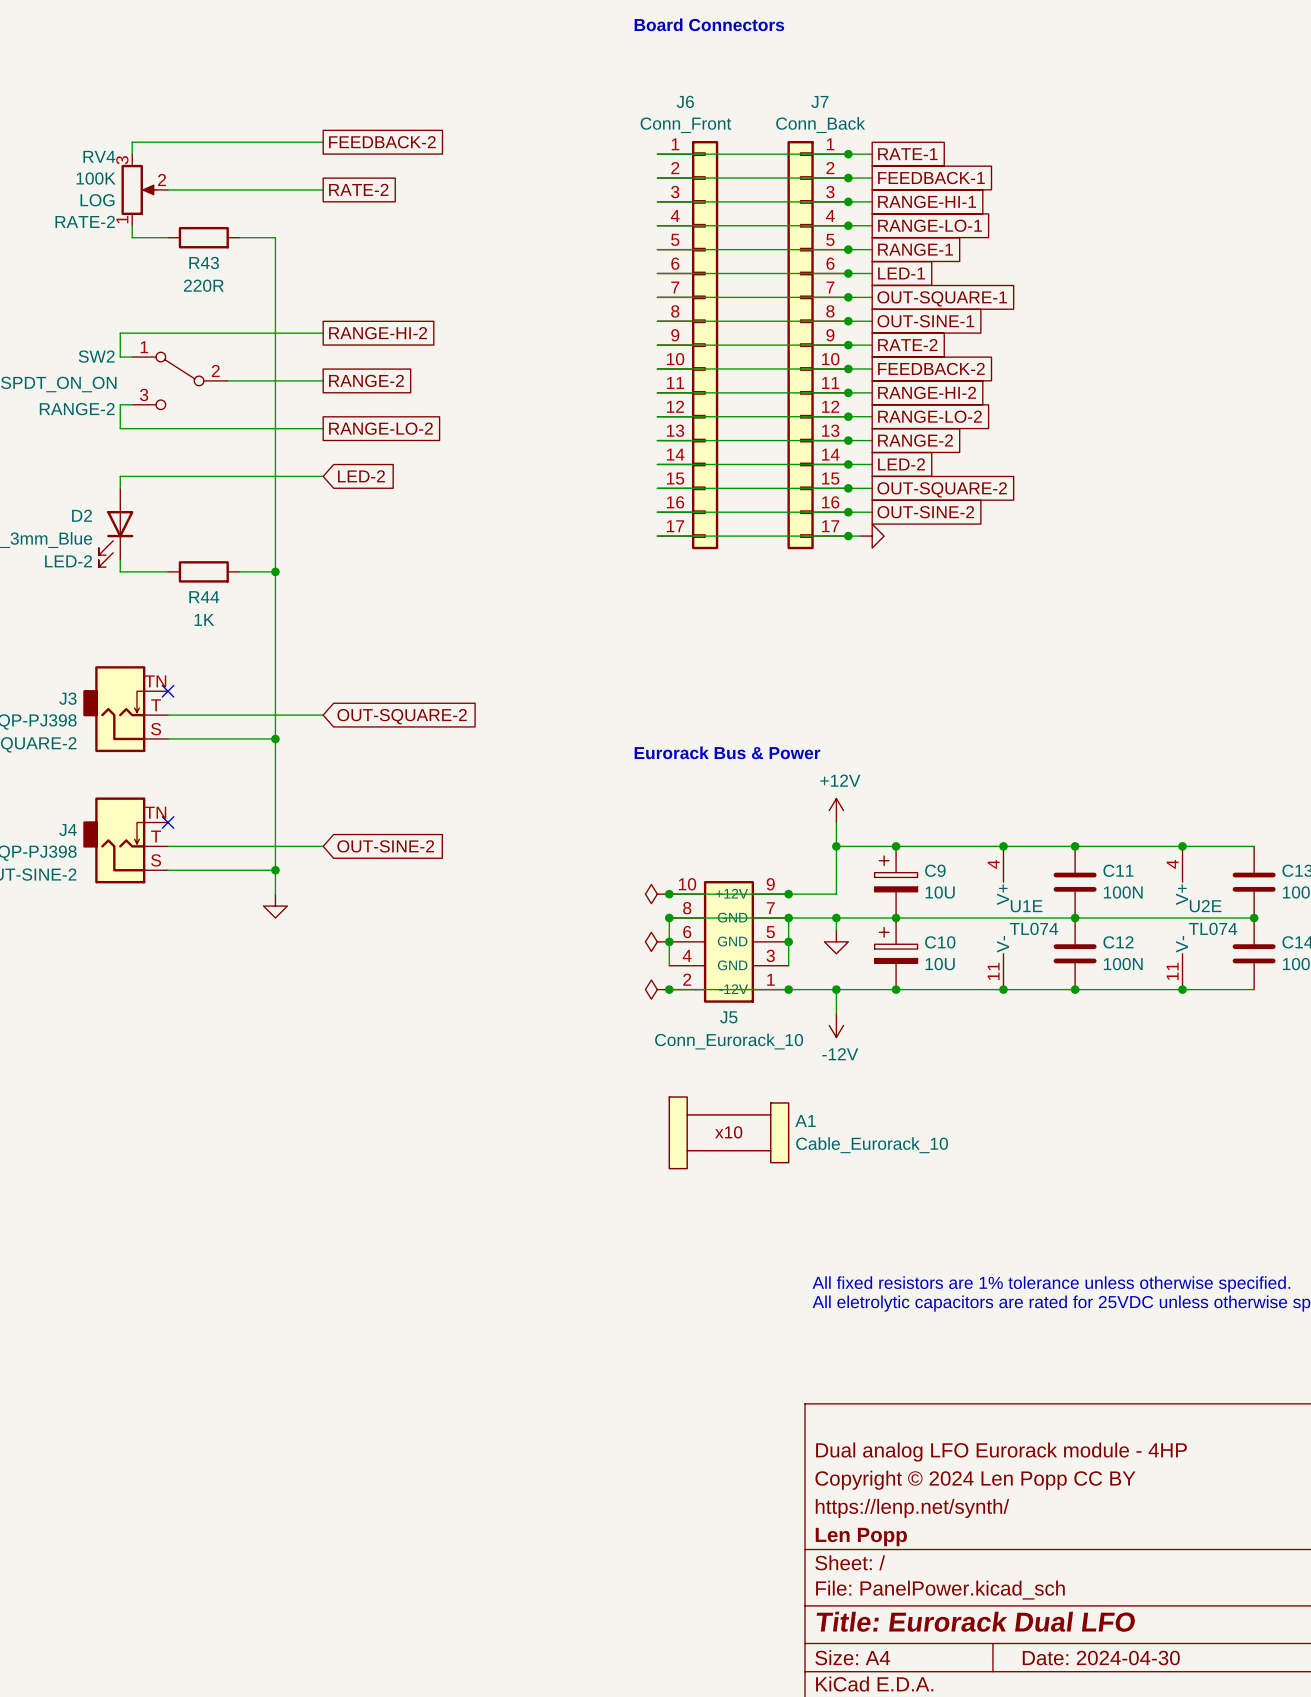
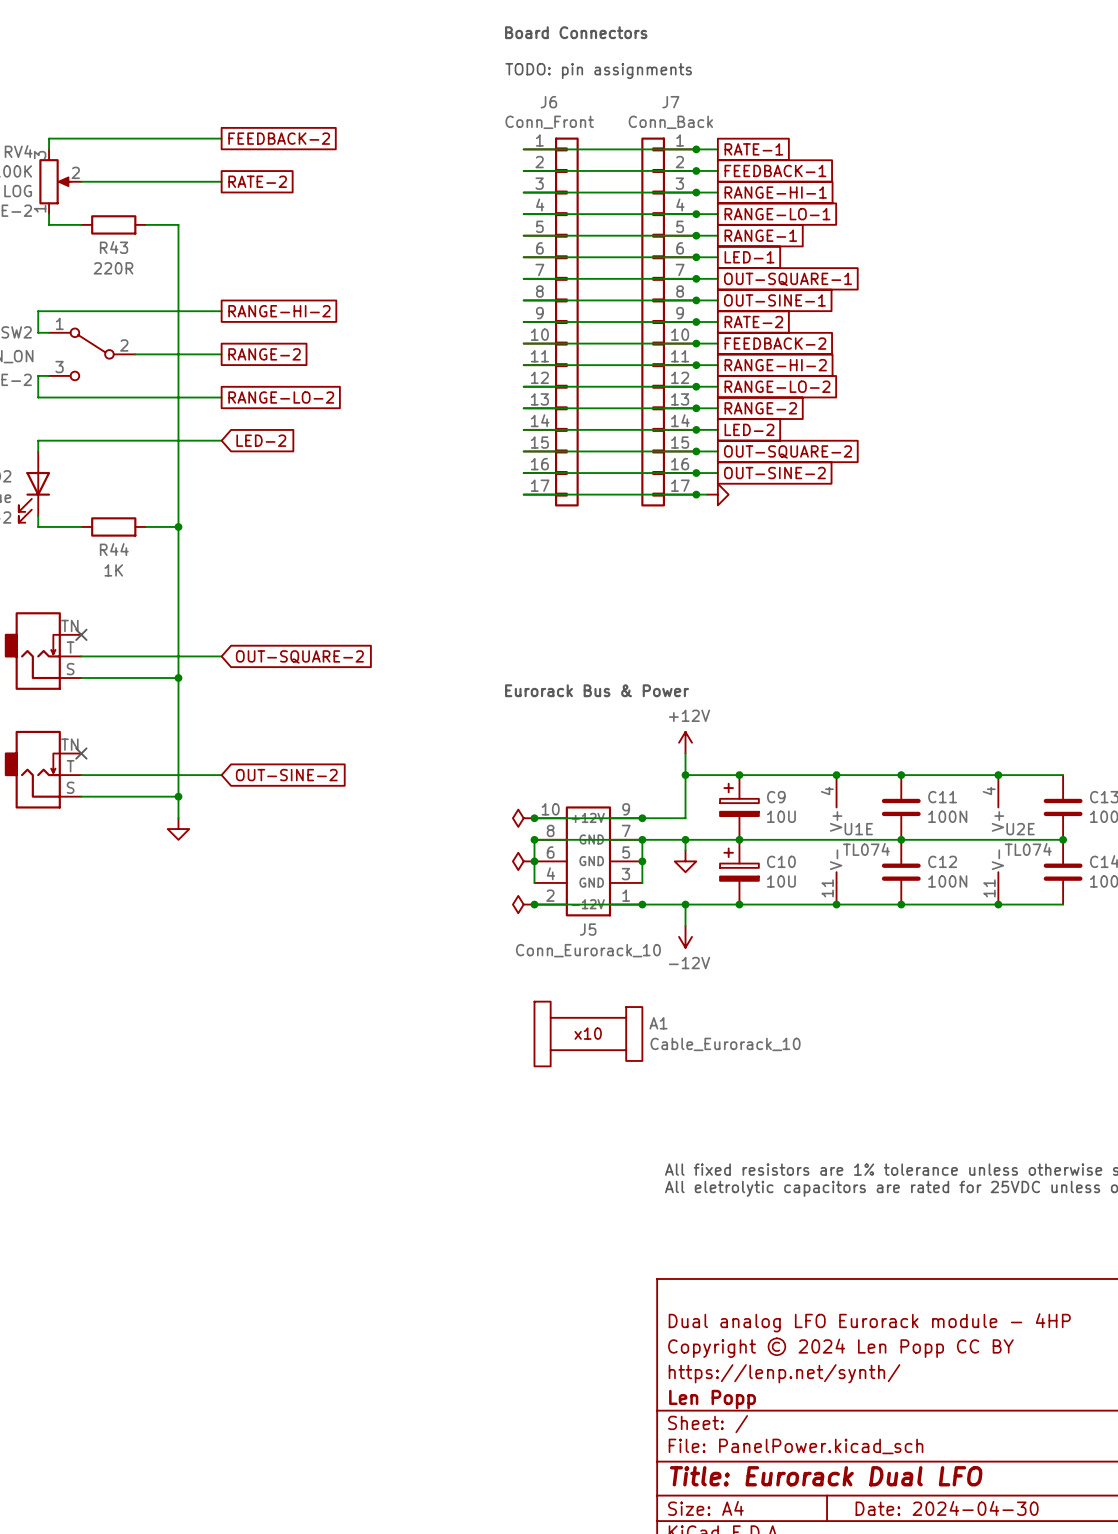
text: none -> TODO: pin assignments (598, 70)

